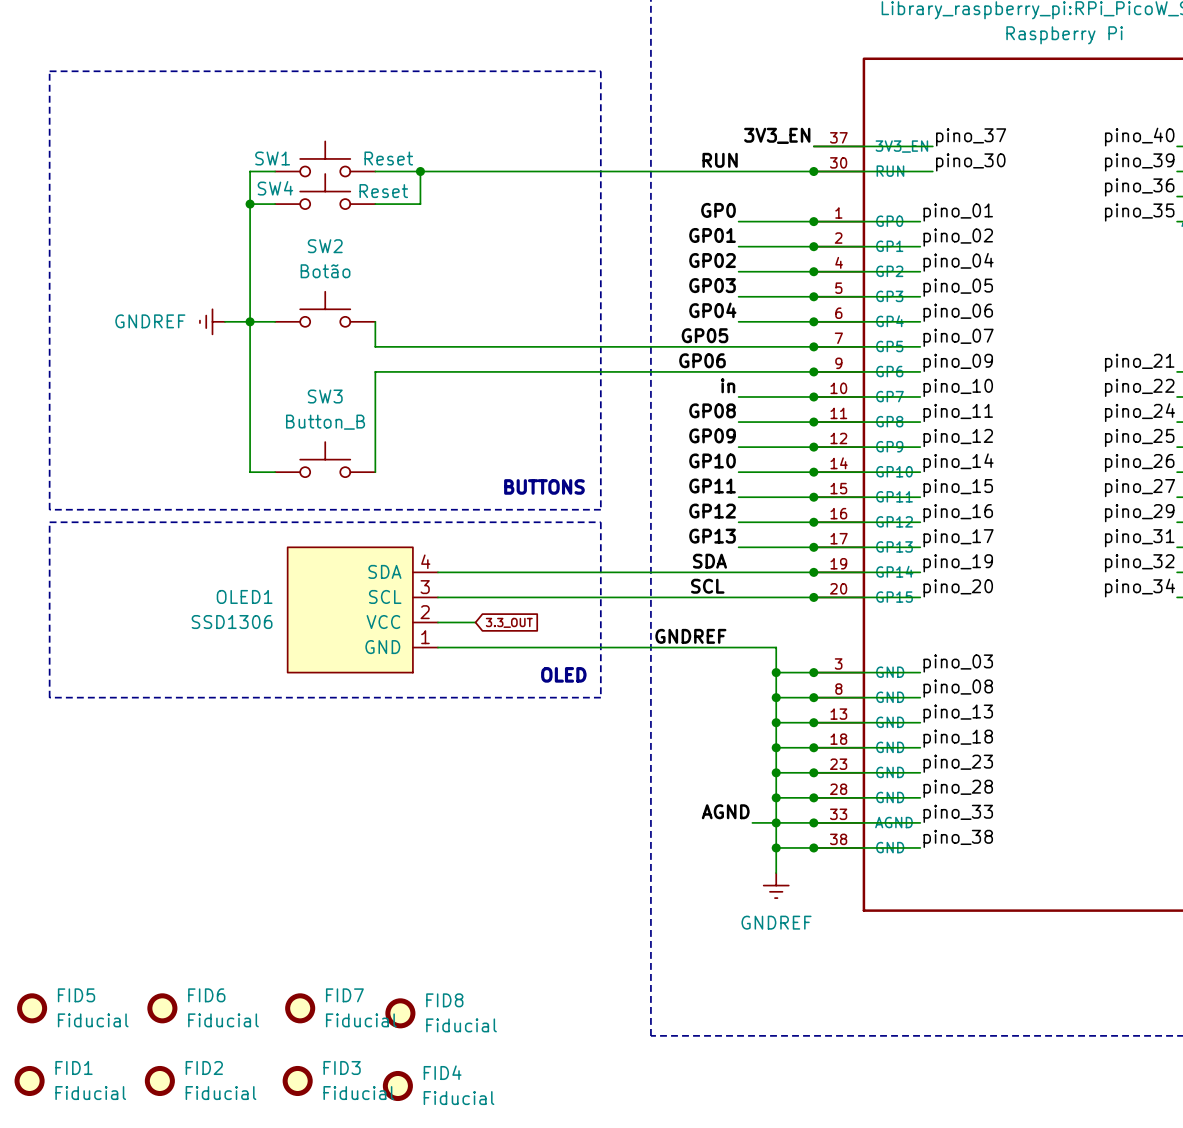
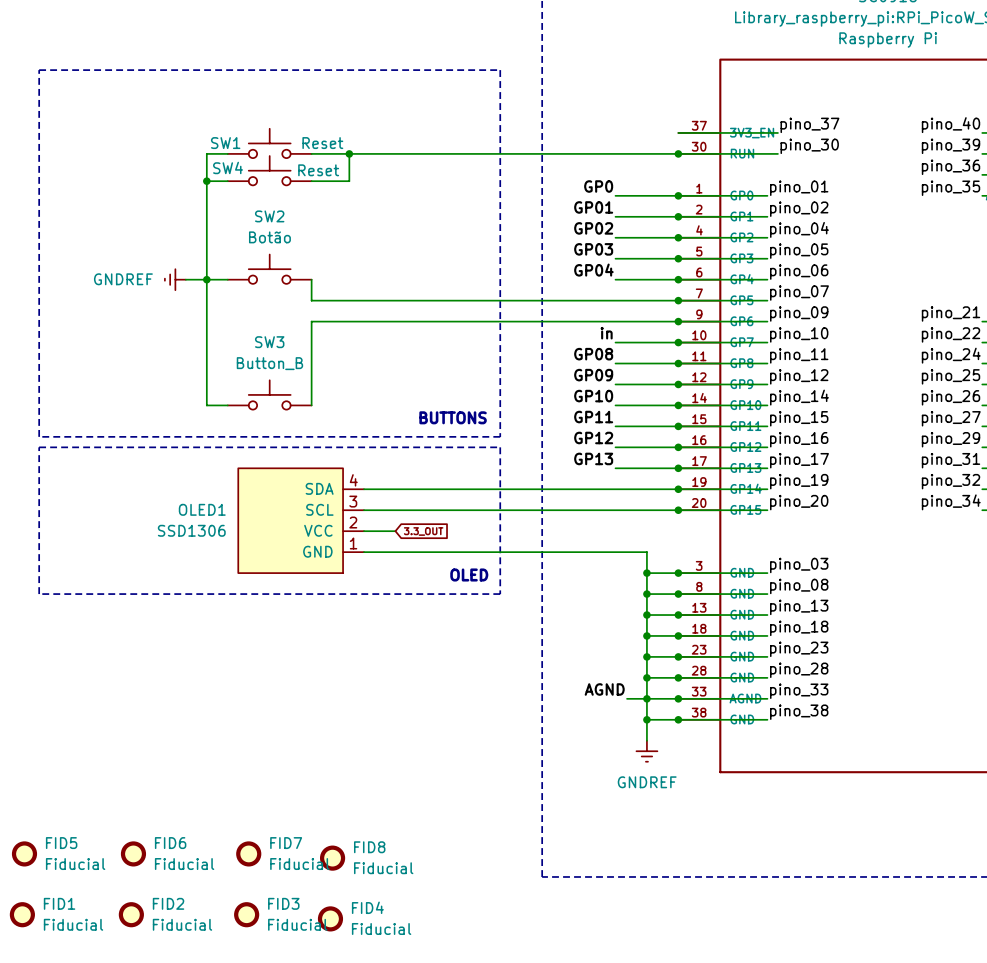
label: 3V3_EN (777, 135) -> none
label: RUN (720, 160) -> none
label: GP05 (705, 335) -> none
label: GP06 (702, 360) -> none
label: SDA (709, 561) -> none
label: SCL (707, 586) -> none
label: GNDREF (690, 636) -> none

